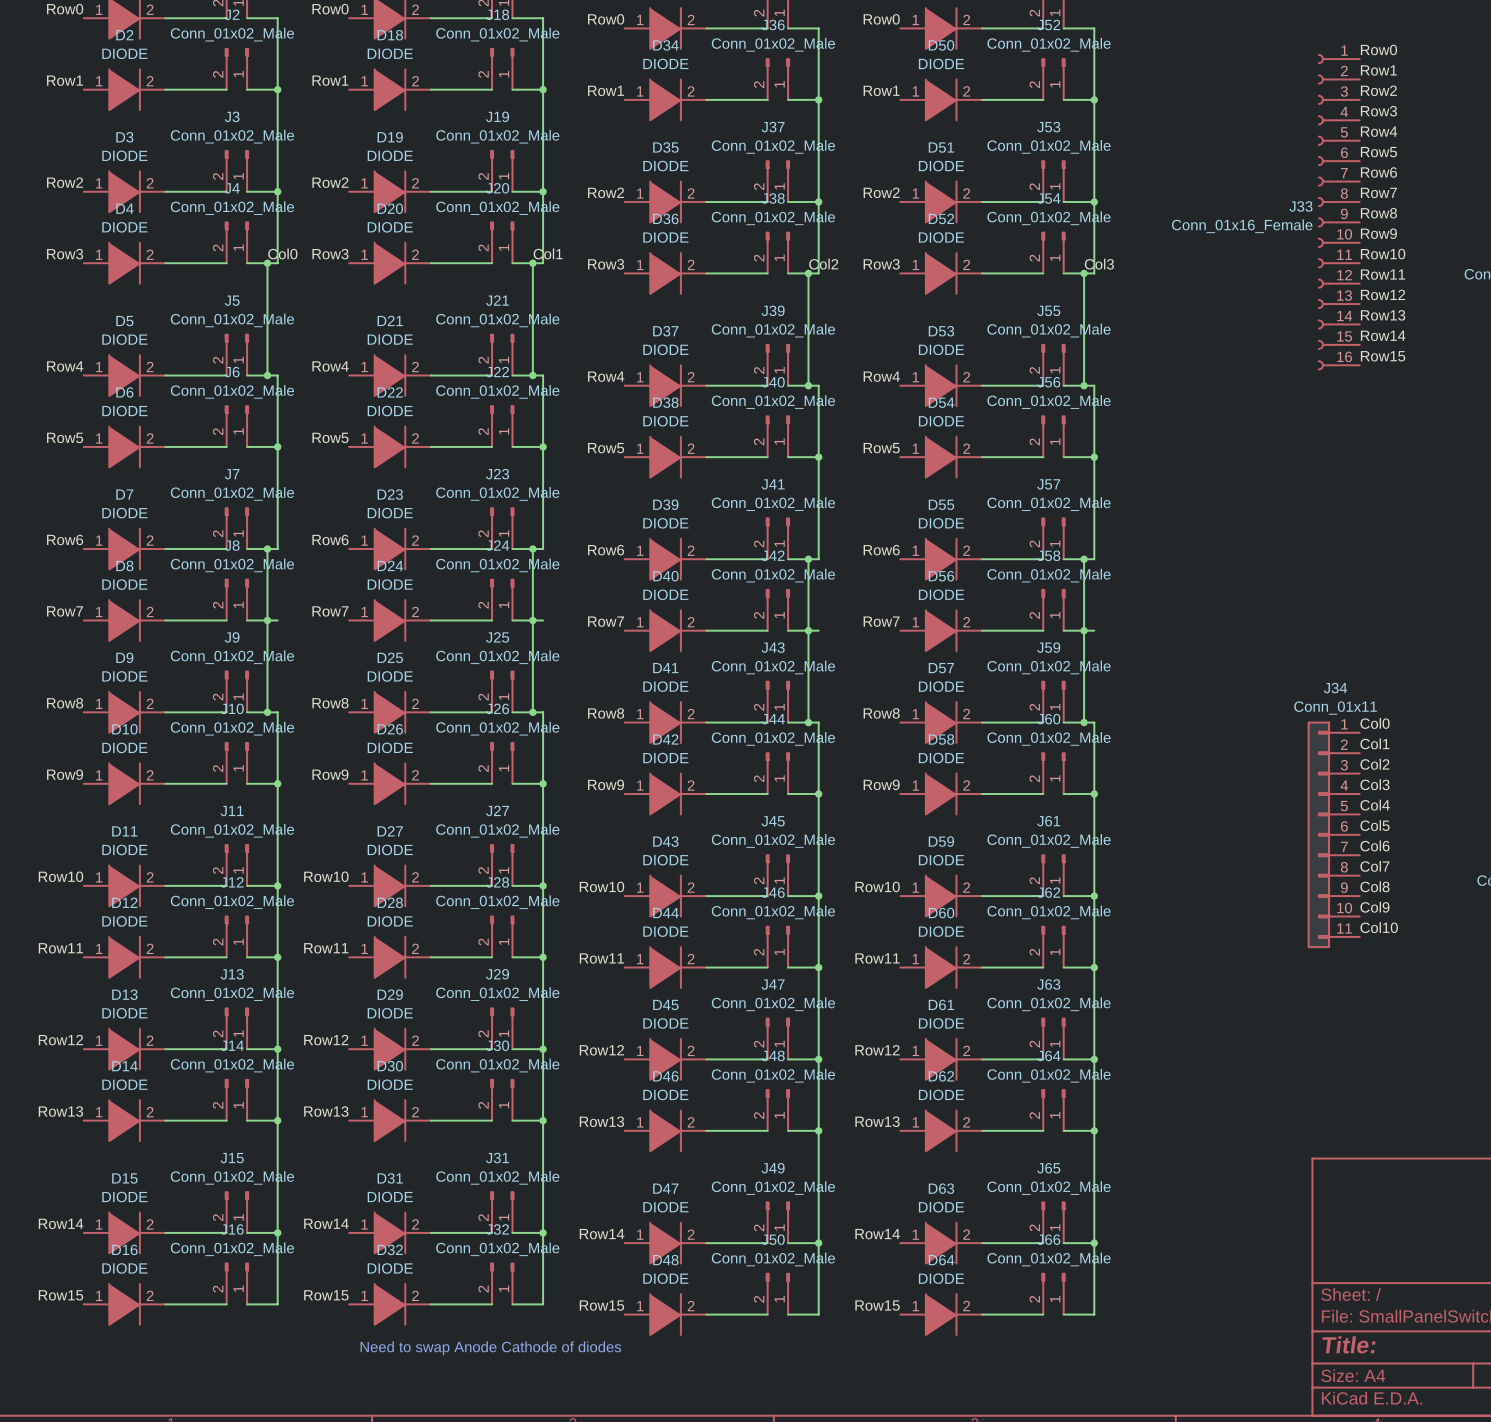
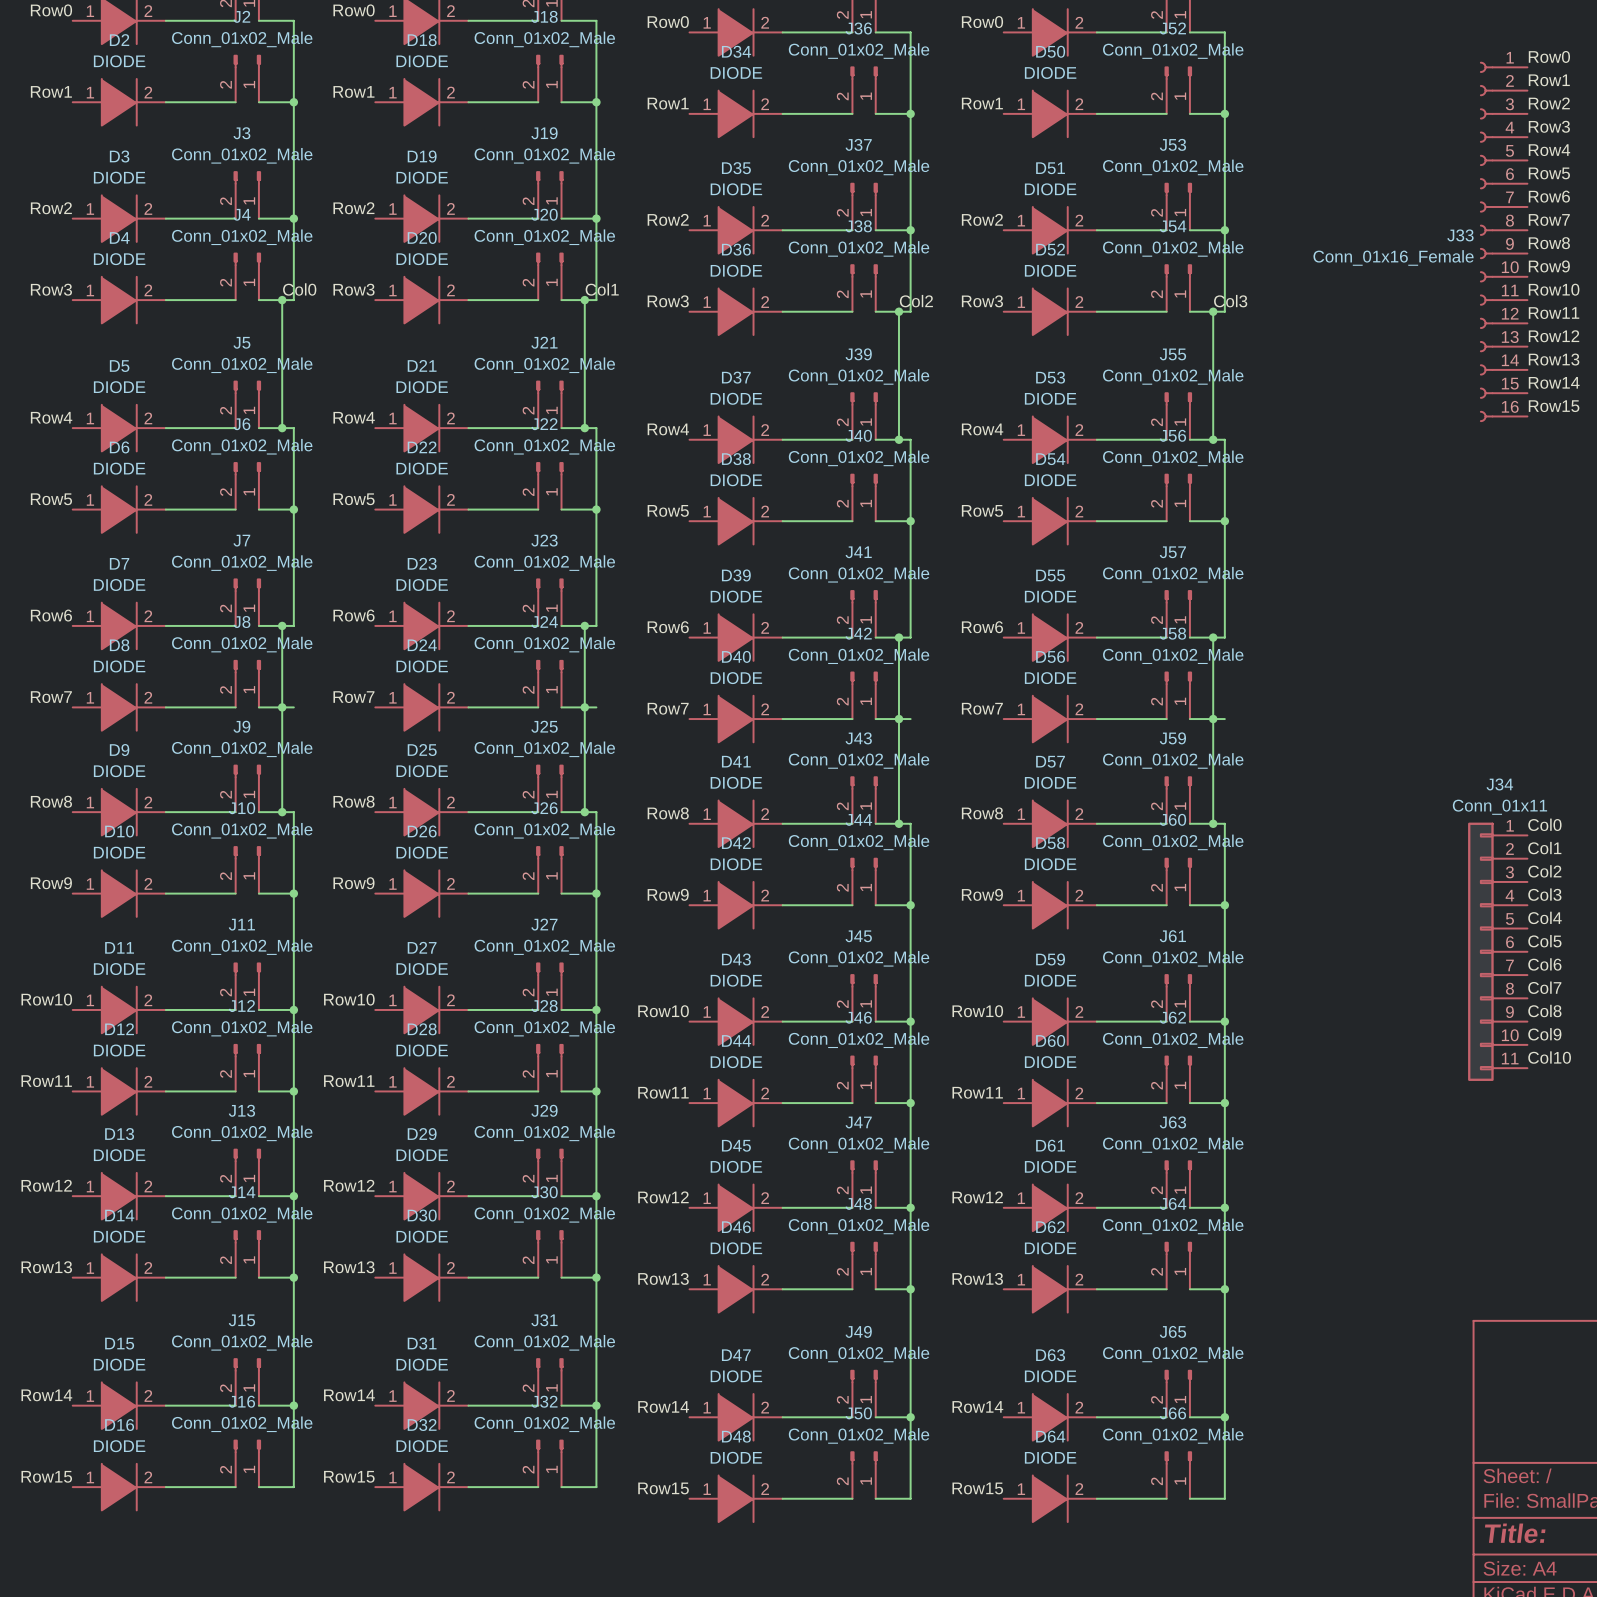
text: Need to swap Anode Cathode of diodes (490, 1348) -> none

